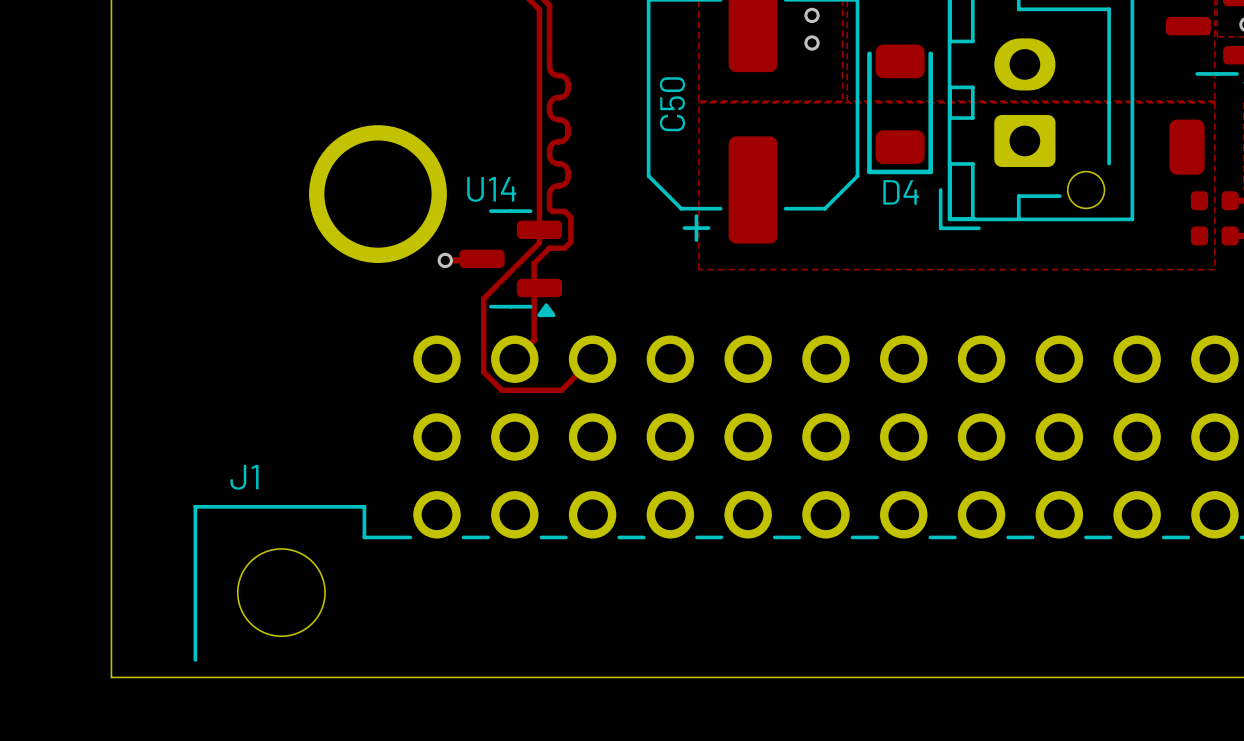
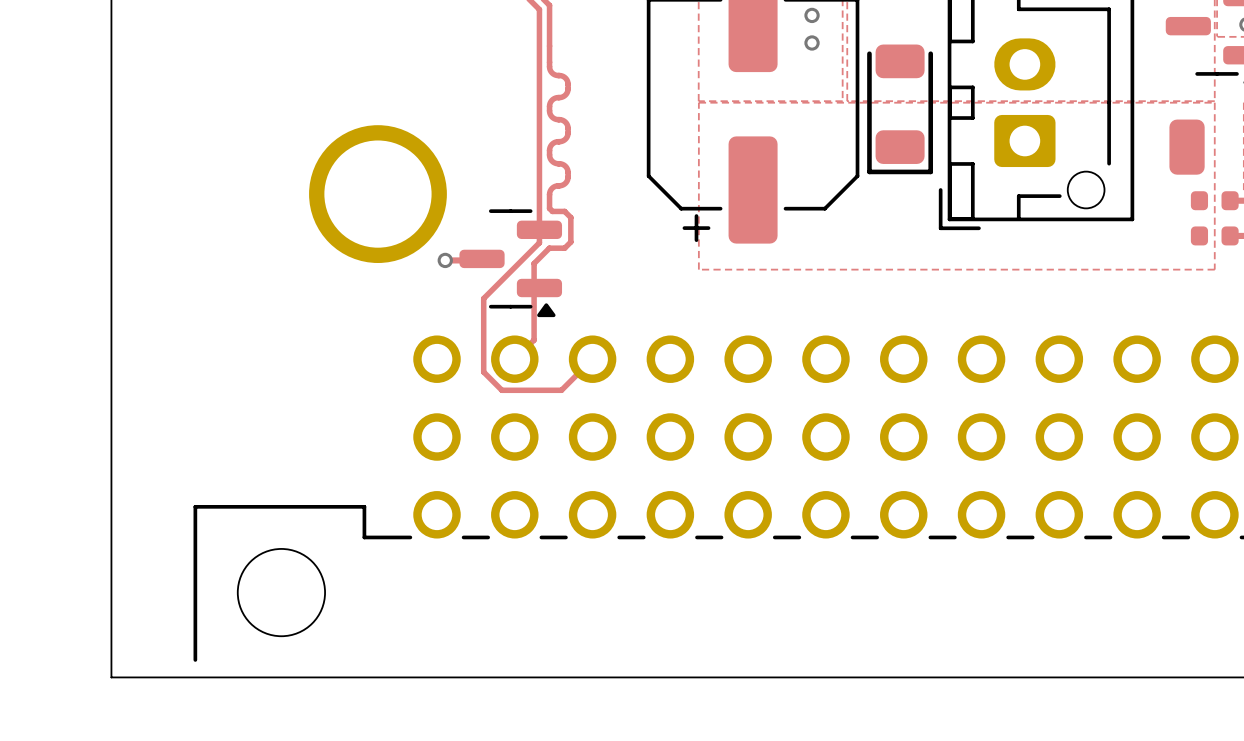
C50 name: C50 (672, 104) -> none
U14 name: U14 (491, 189) -> none
D4 name: D4 (901, 192) -> none
J1 name: J1 (244, 477) -> none

